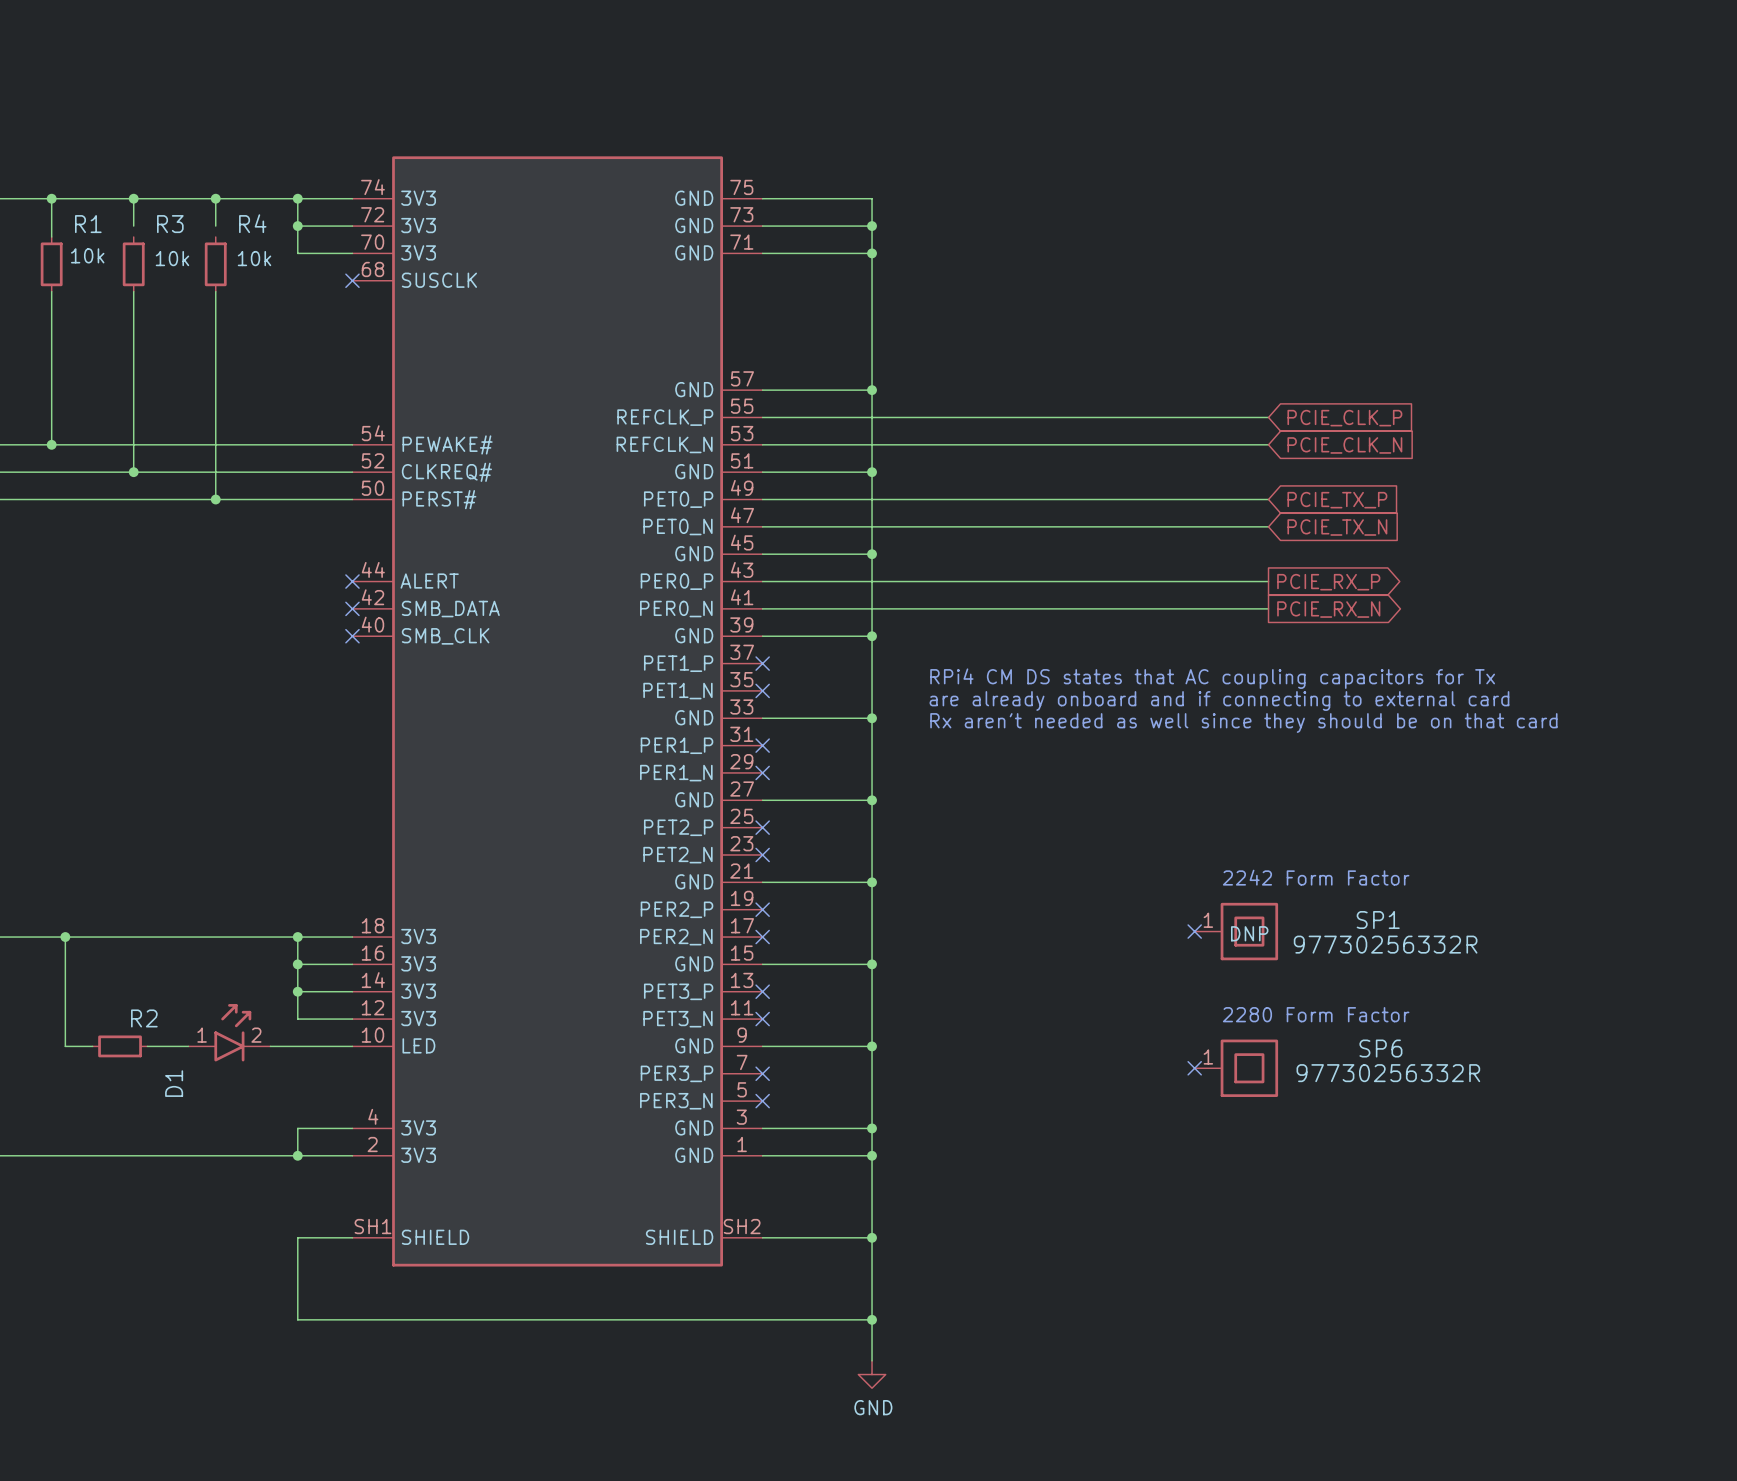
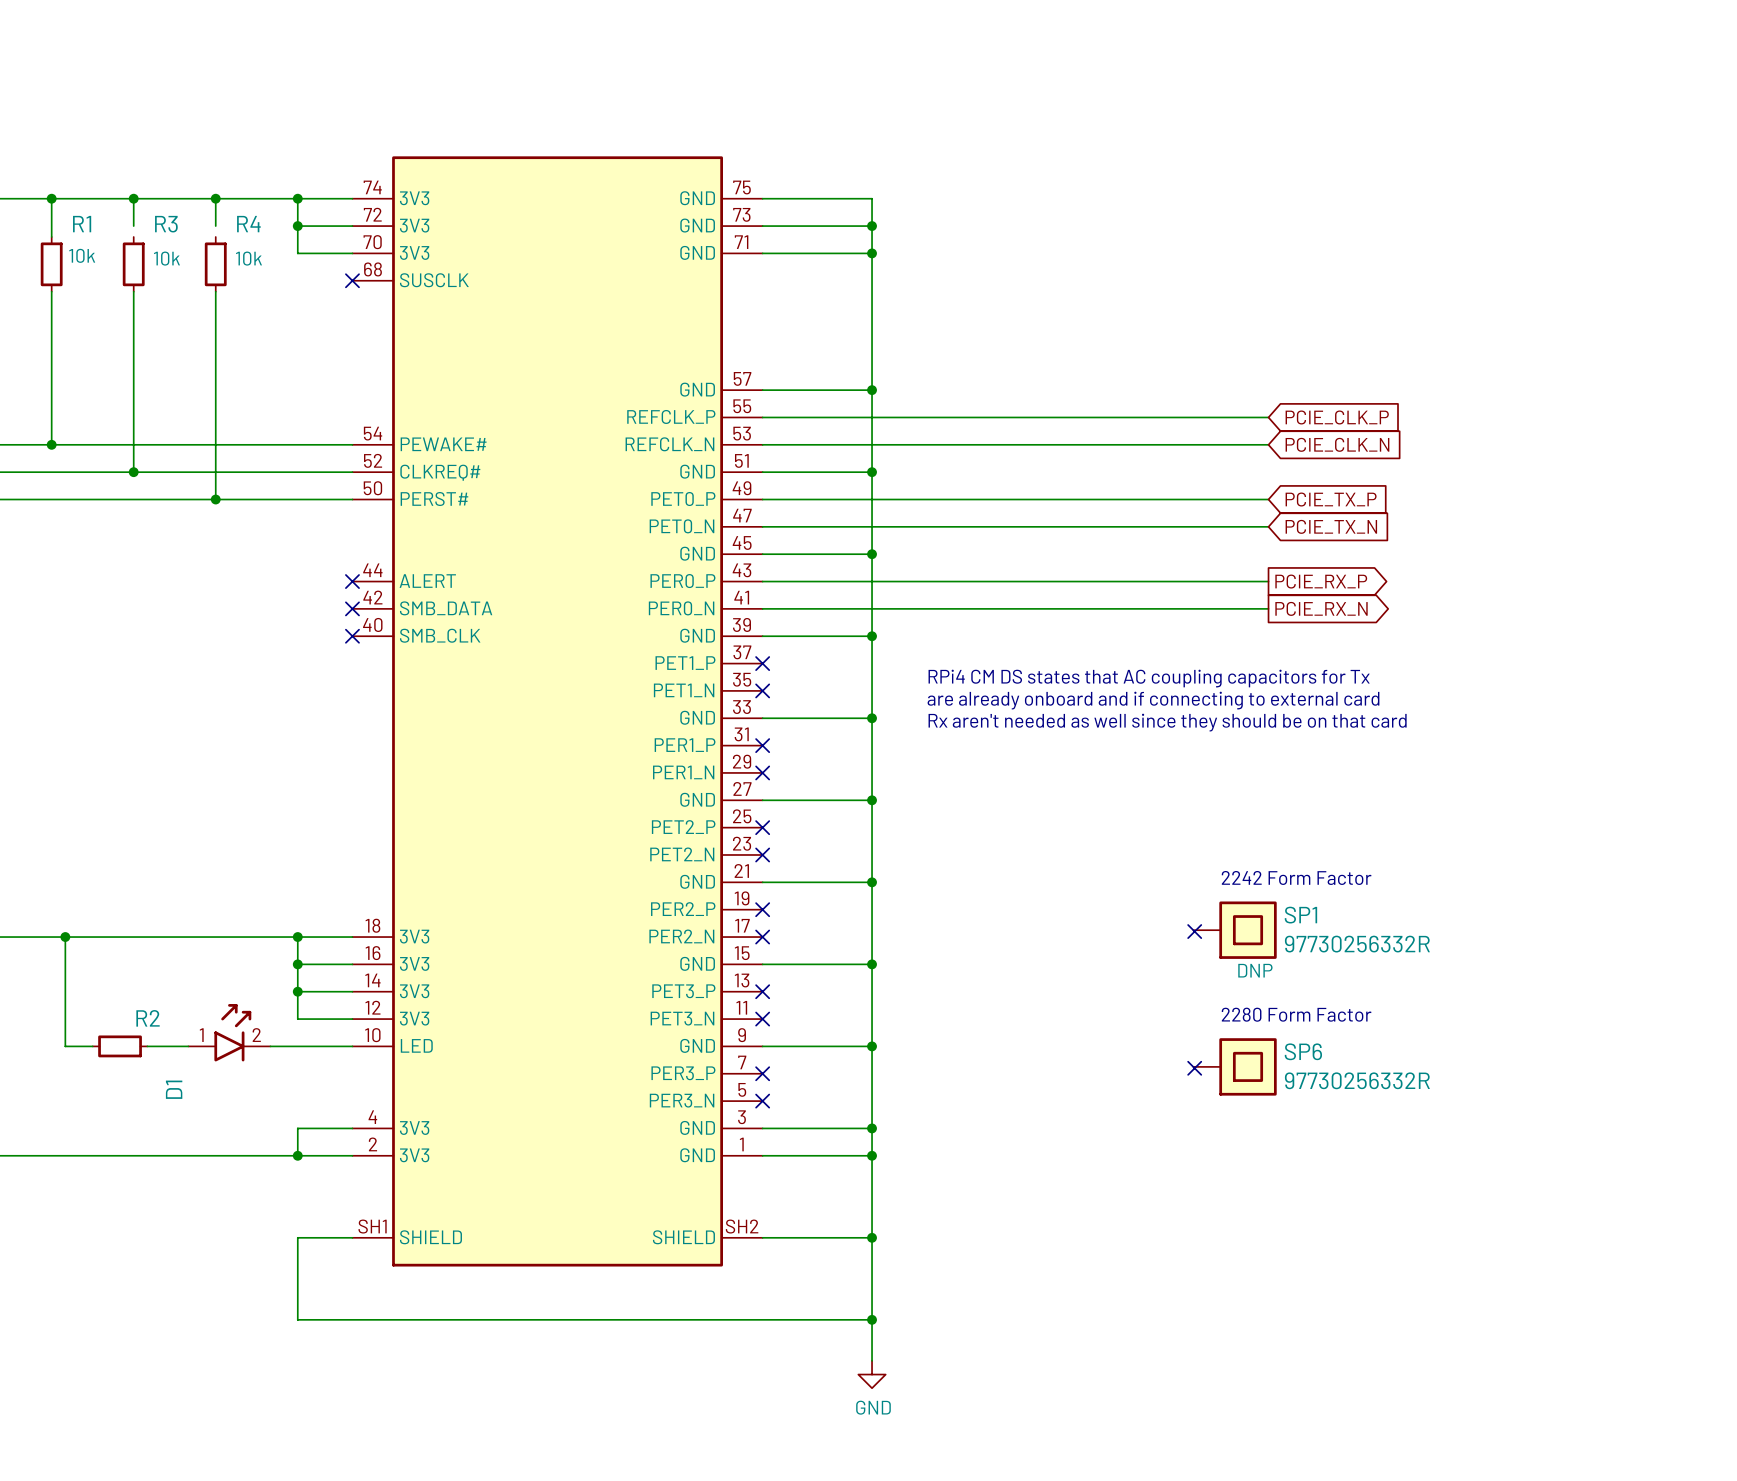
SP1 symbol: [1194, 902, 1279, 961] -> [1193, 901, 1277, 959]
SP1 name position: SP1 (1378, 920) -> SP1 (1300, 915)
SP1 text position: DNP (1249, 933) -> DNP (1255, 970)
SP6 symbol: [1194, 1039, 1279, 1097] -> [1193, 1038, 1277, 1096]
SP6 name position: SP6 (1380, 1048) -> SP6 (1303, 1051)

